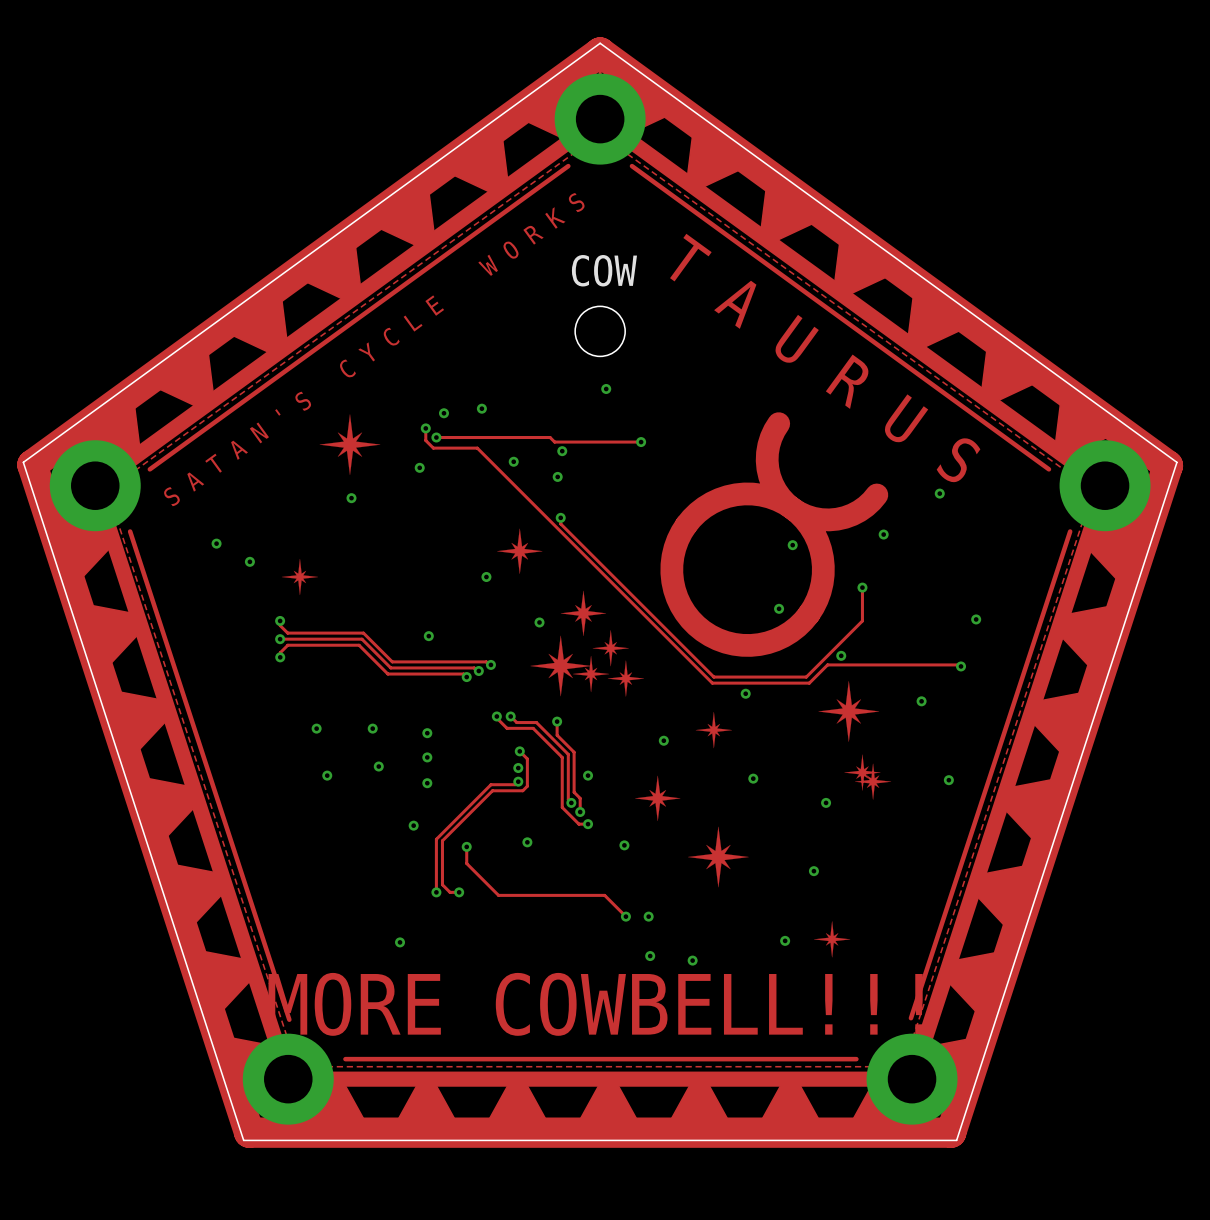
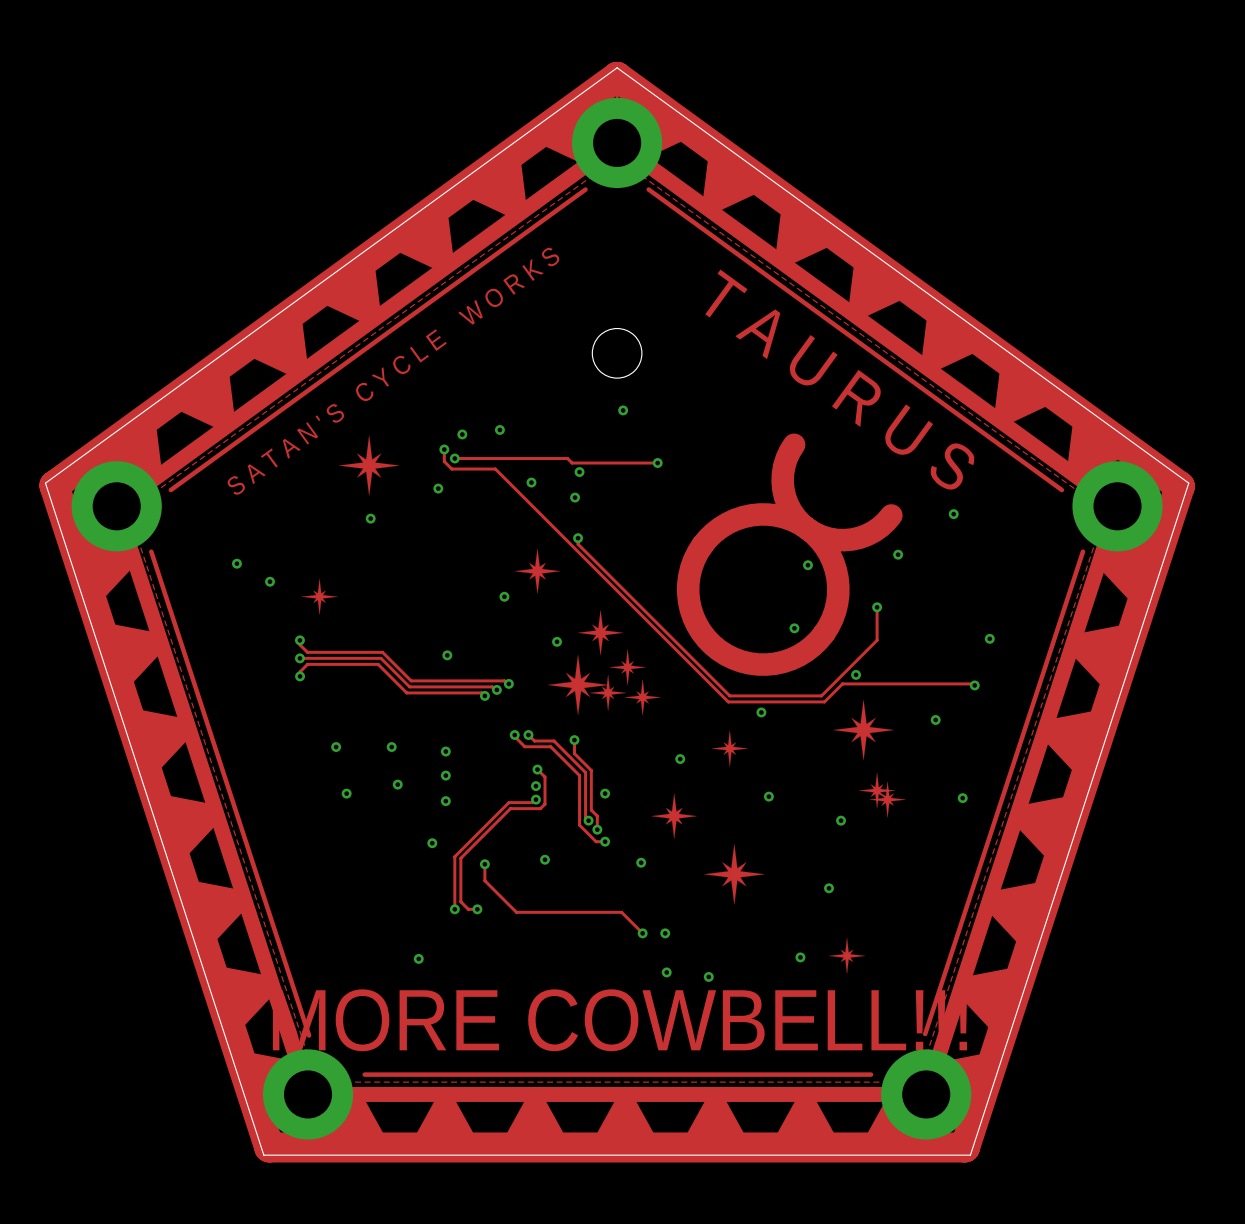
COW name: COW (604, 270) -> none

